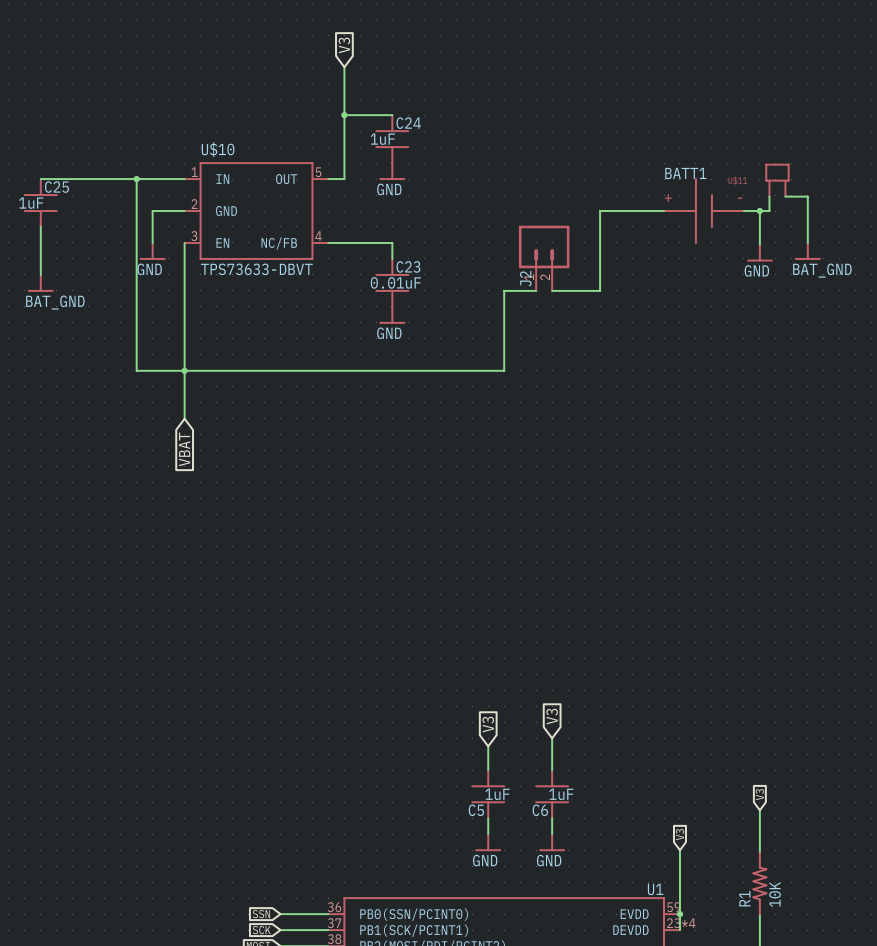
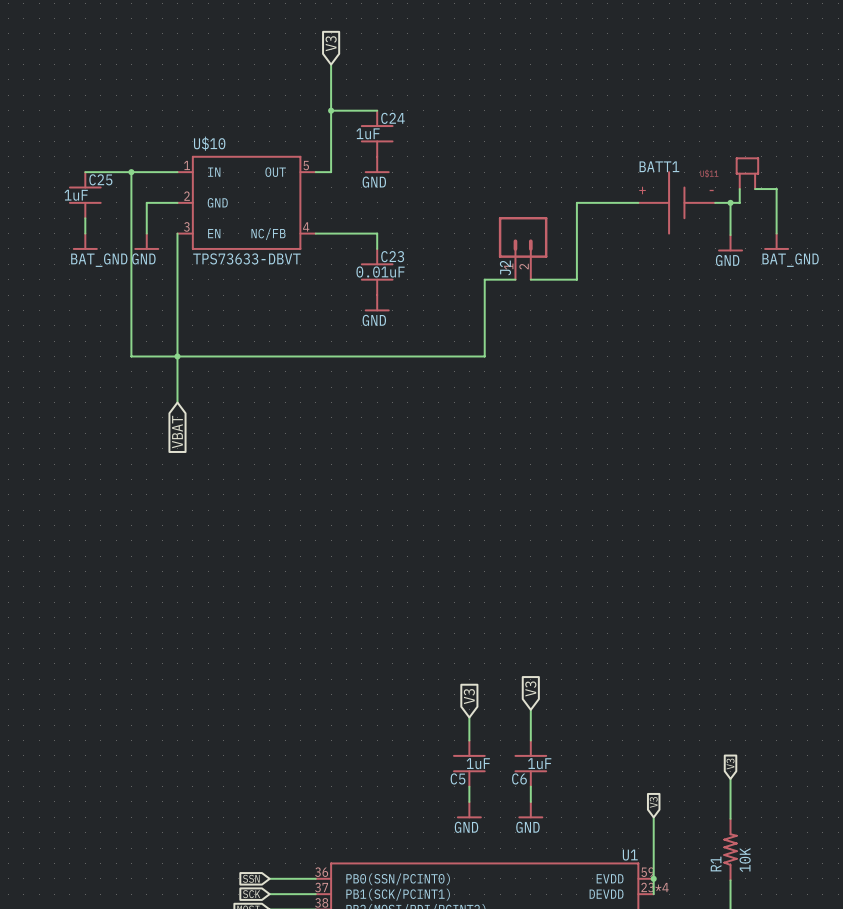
wire: (40, 179) (88, 179) -> none
C25 position: (40, 203) -> (85, 195)
wire: (40, 226) (40, 274) -> none
wire: none -> (85, 218) (85, 233)
power symbol position: BAT_GND (40, 283) -> BAT_GND (85, 241)

